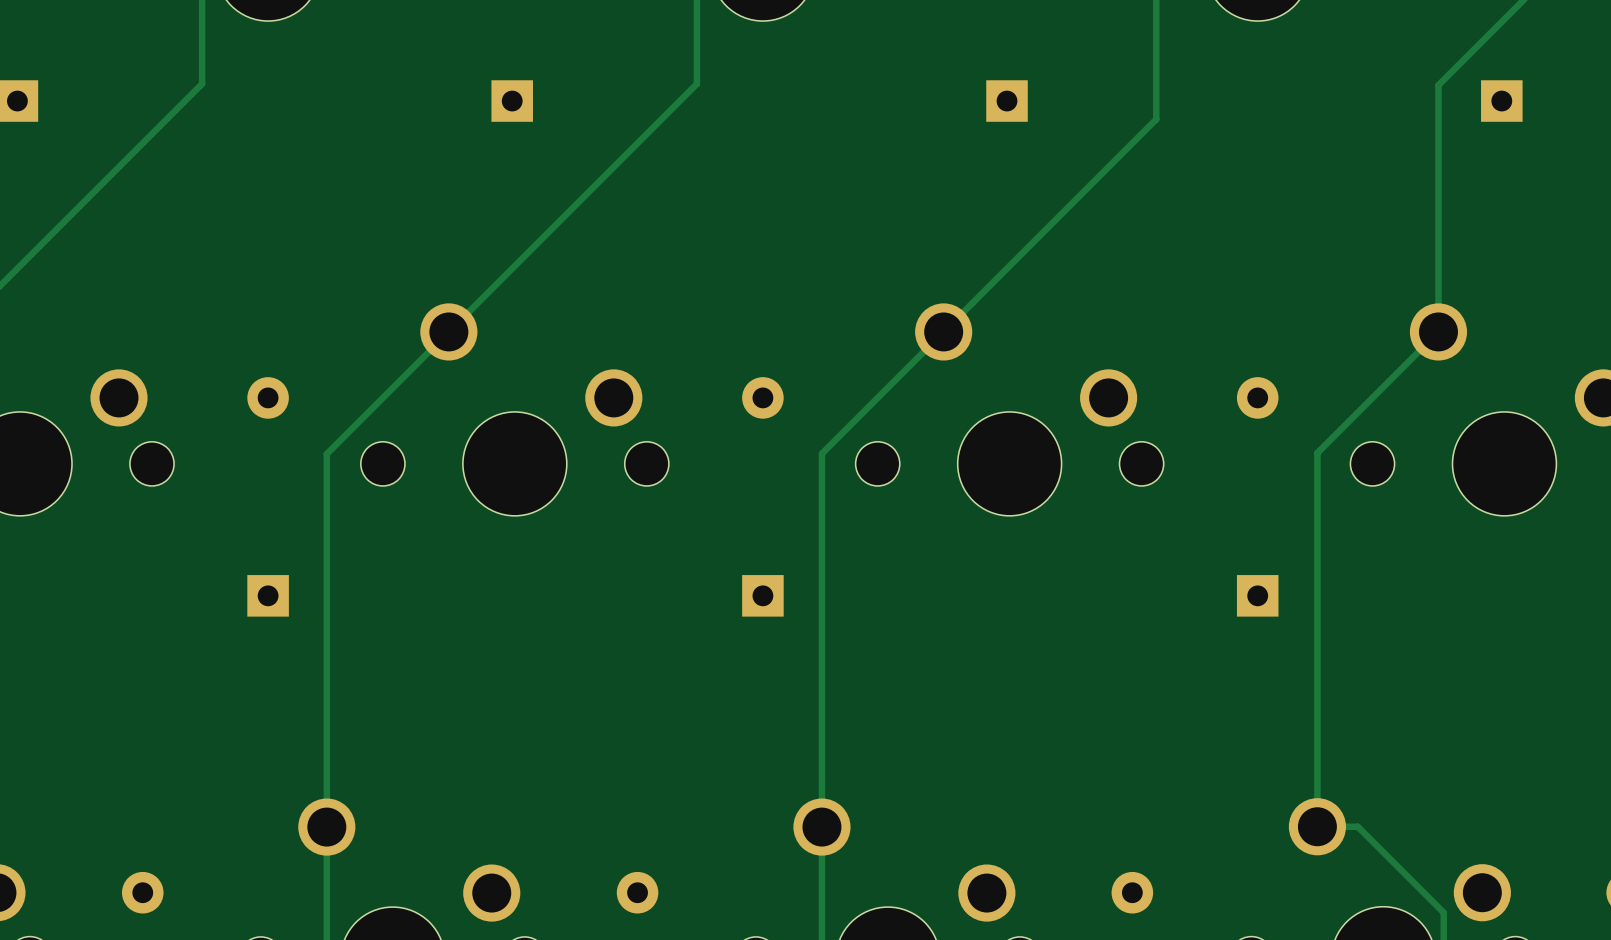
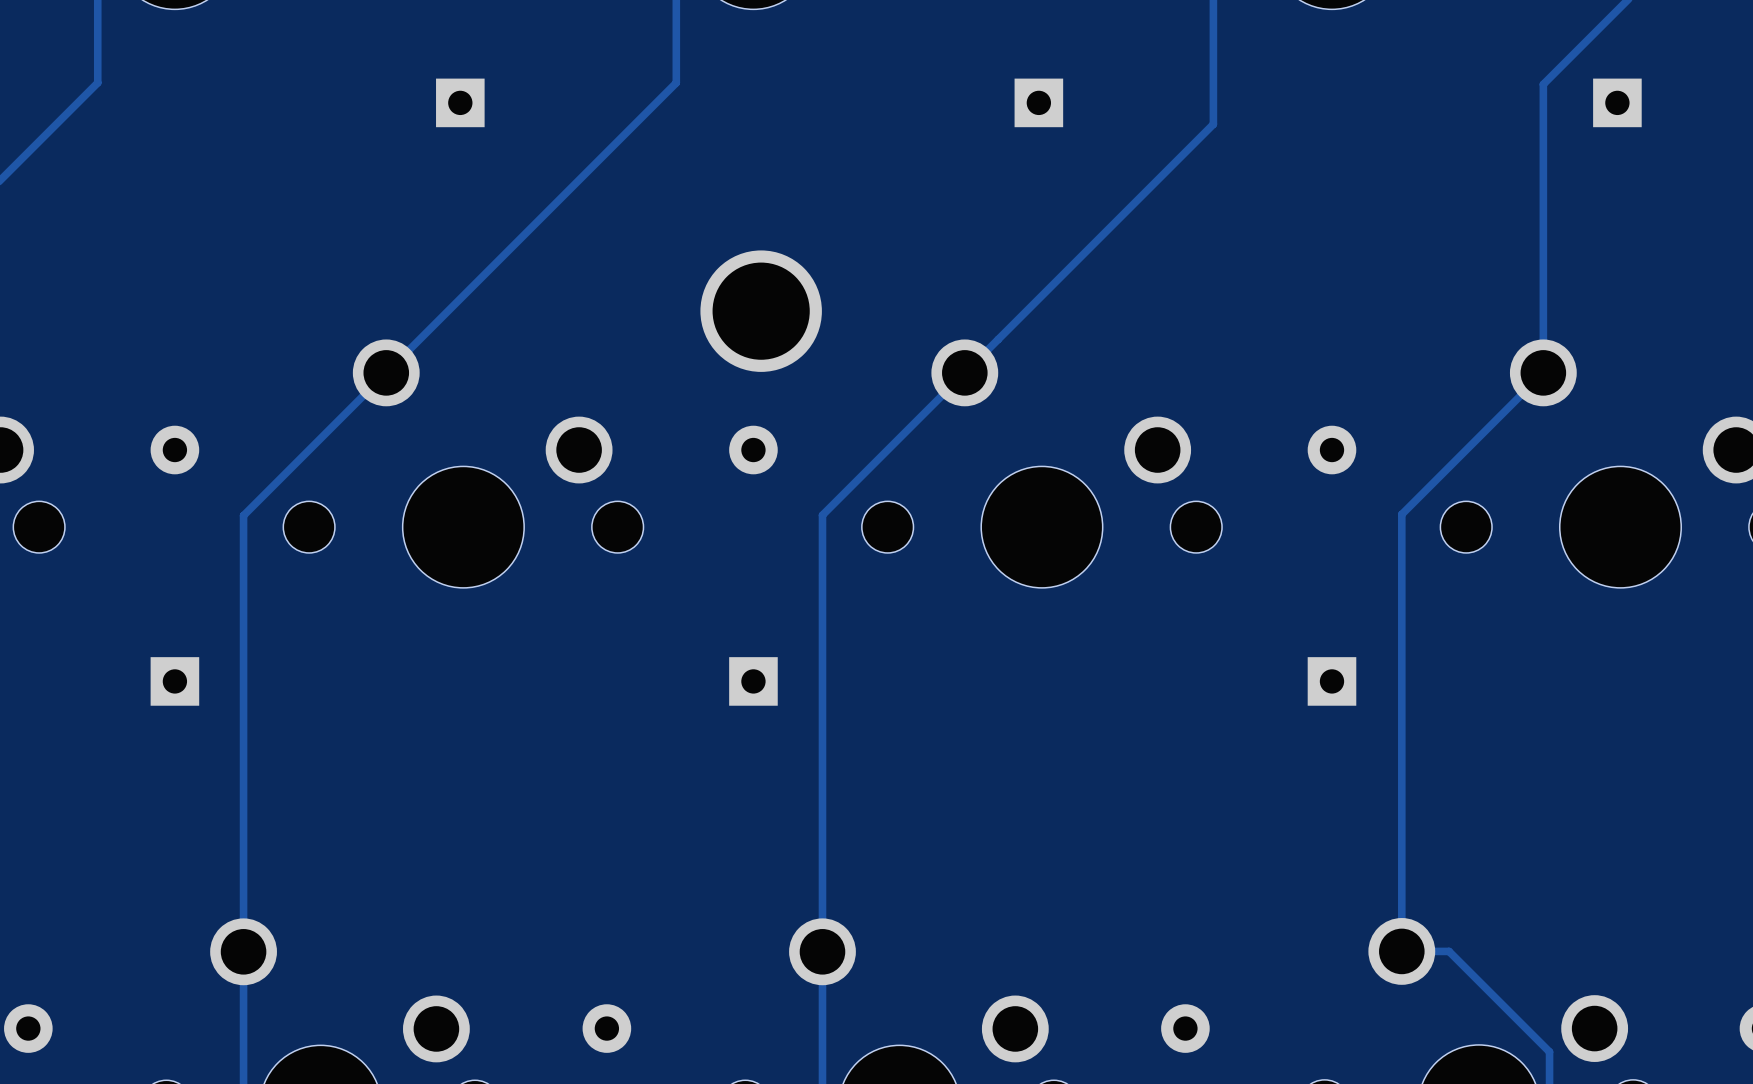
part: none -> (761, 311)

